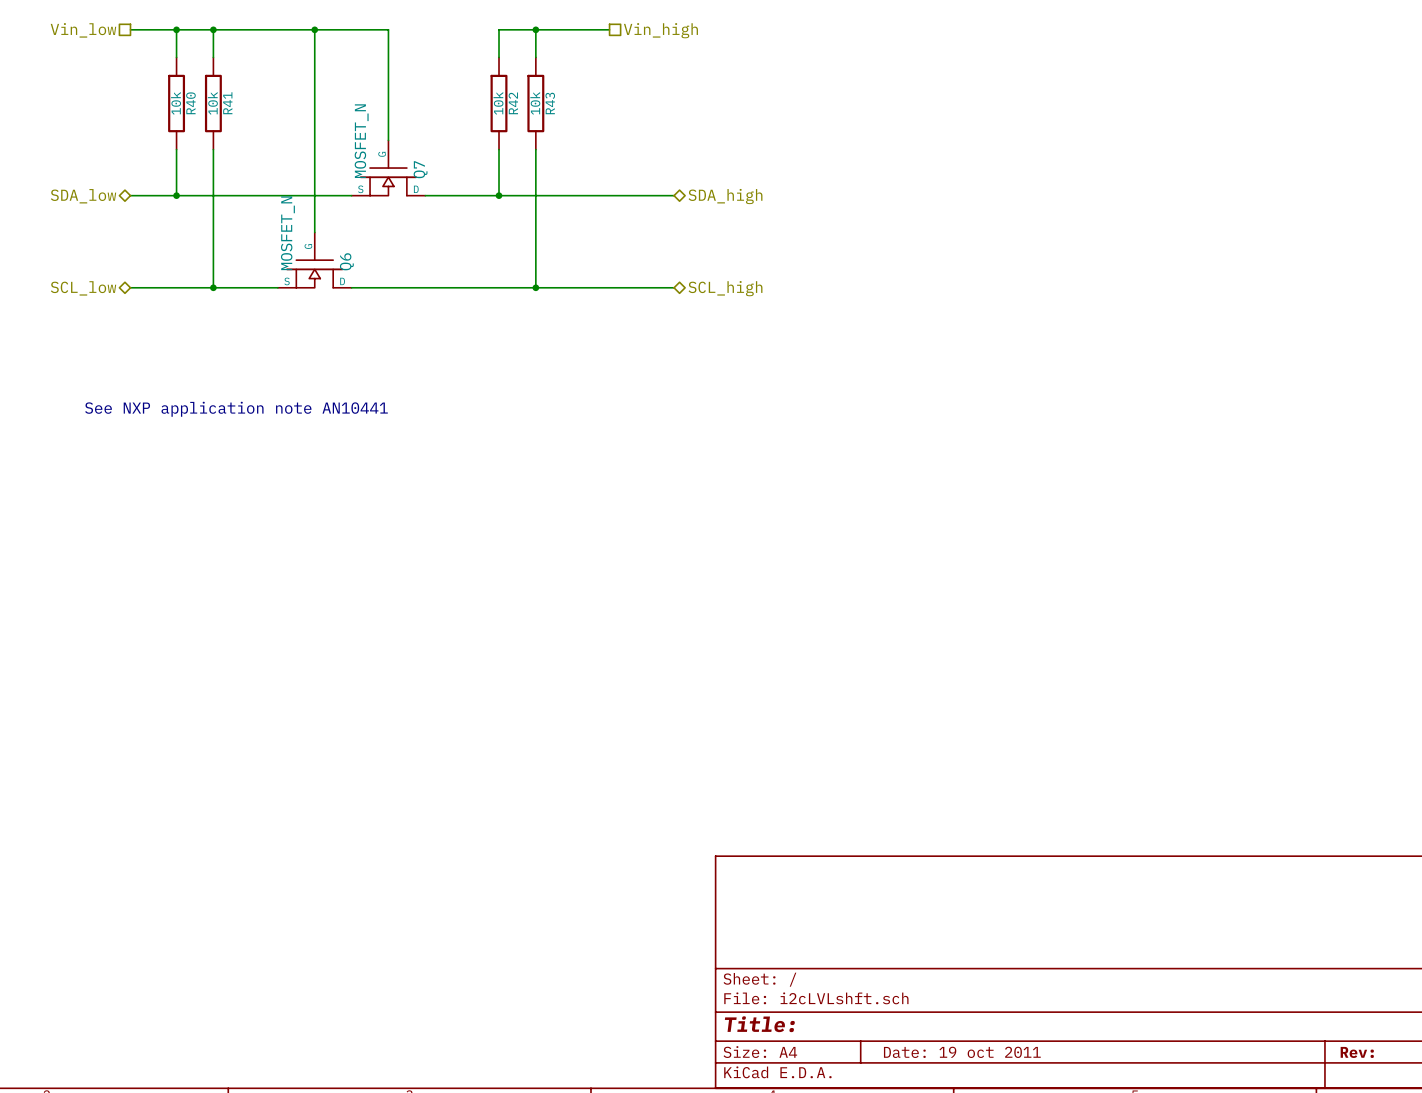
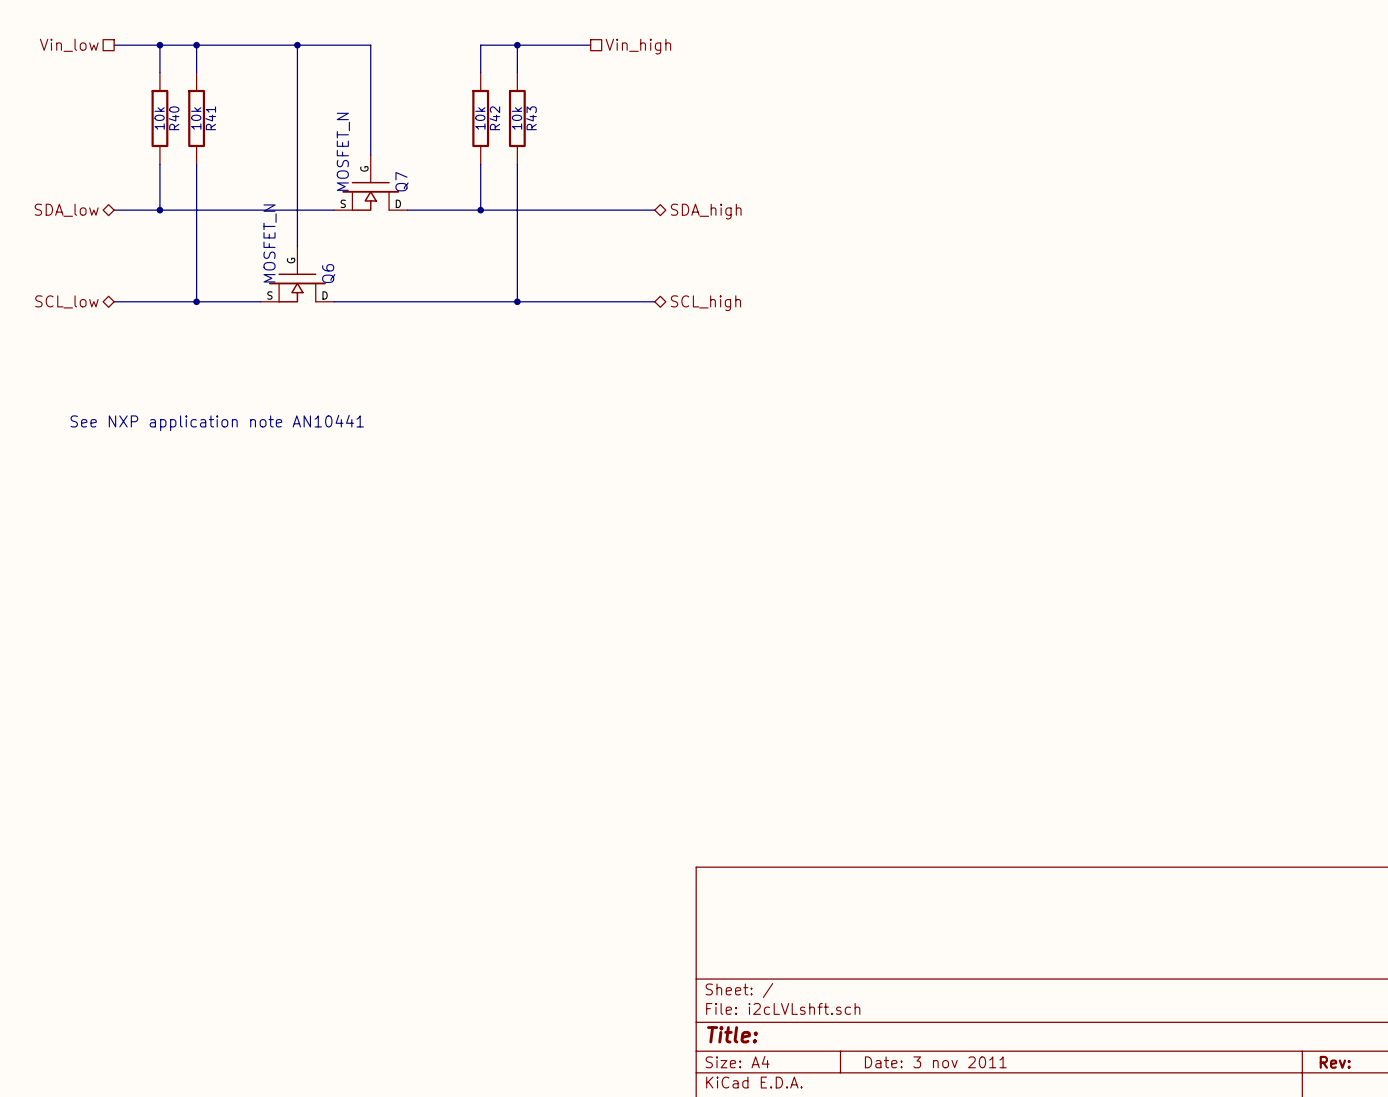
title block: Date: 19 oct 2011 (962, 1052) -> Date: 3 nov 2011 (935, 1062)

